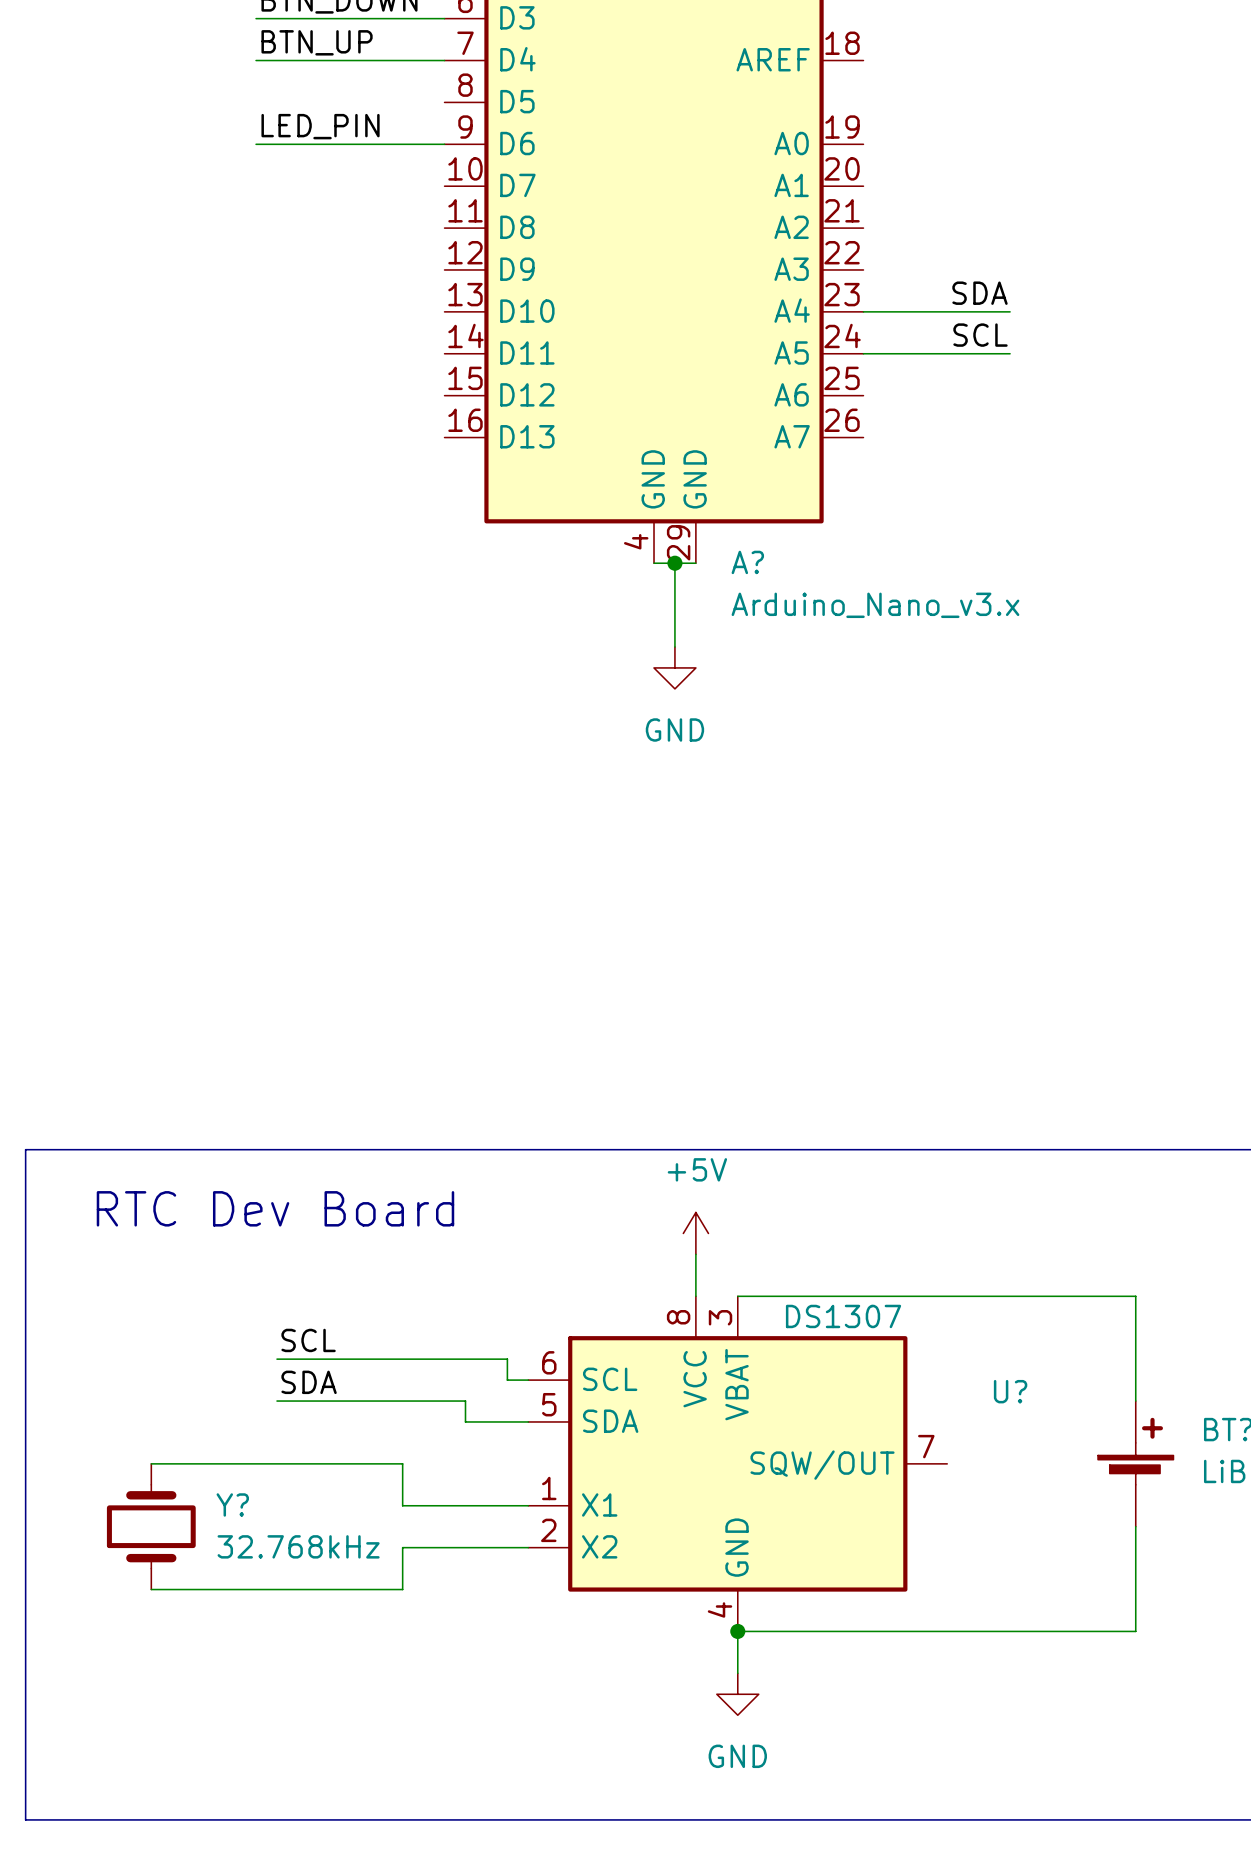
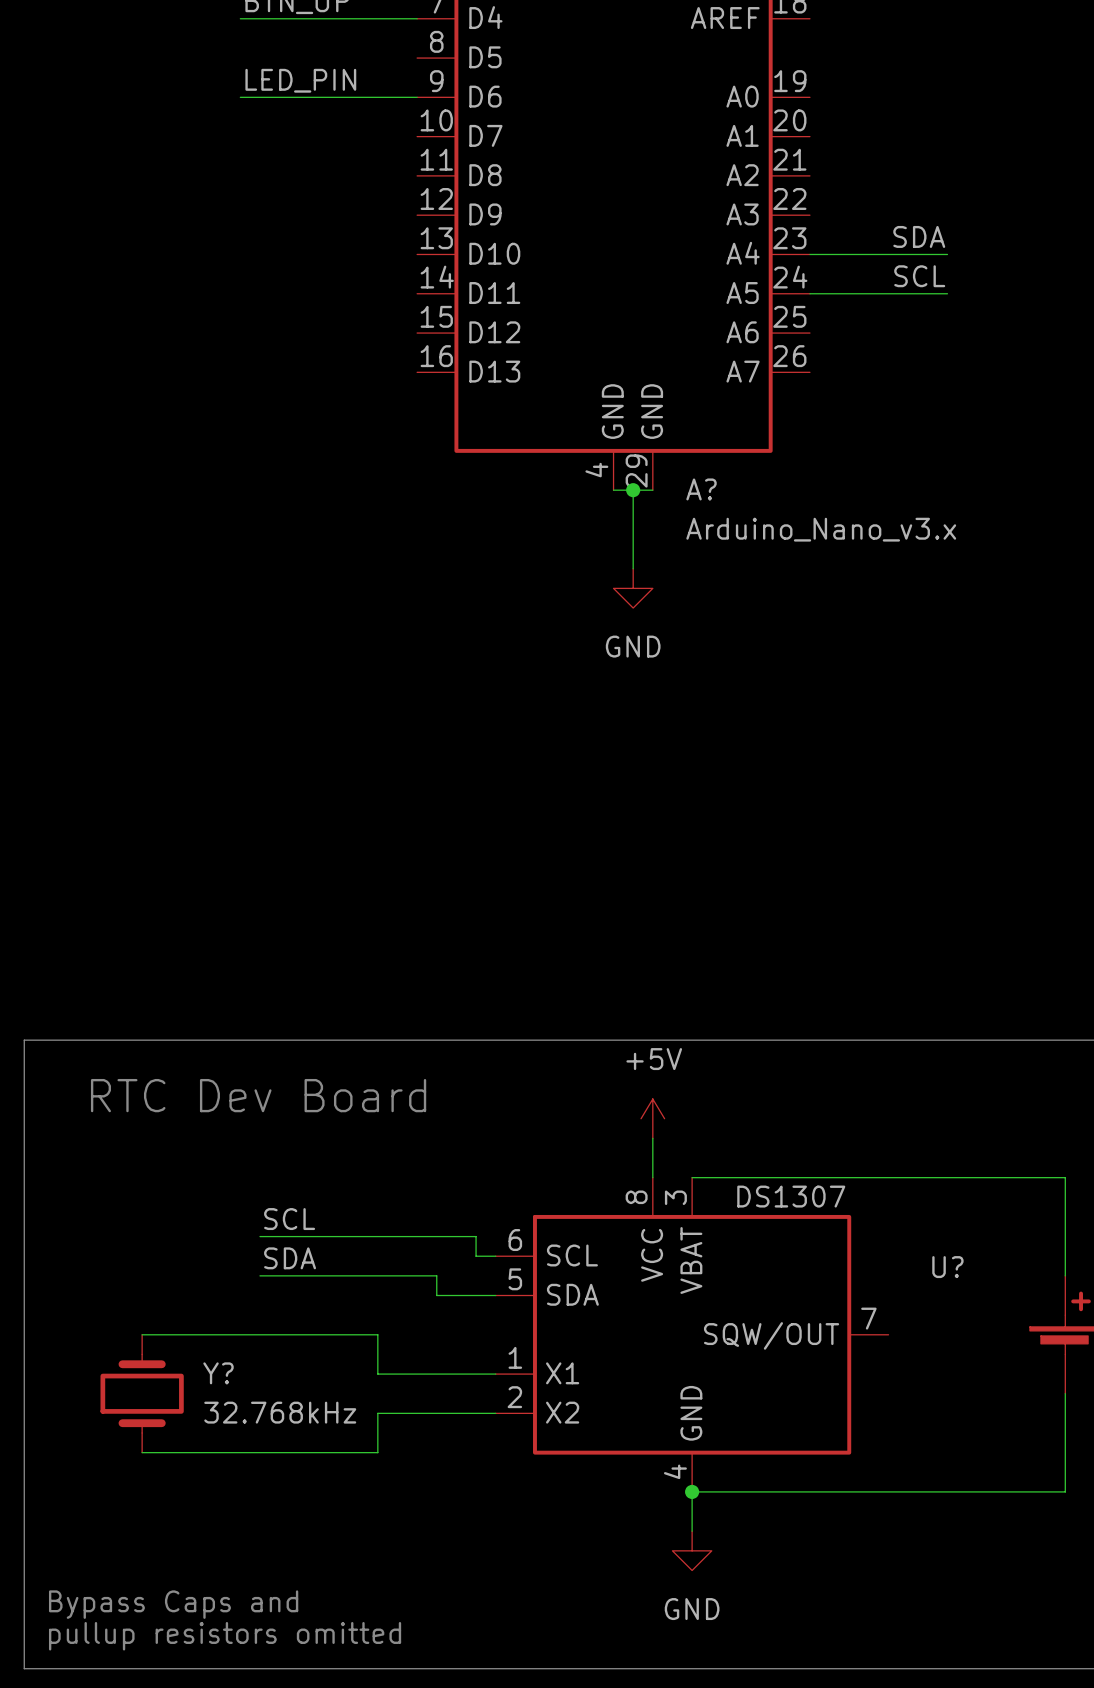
text: none -> Bypass Caps and (173, 1604)
text: none -> pullup resistors omitted (225, 1636)

